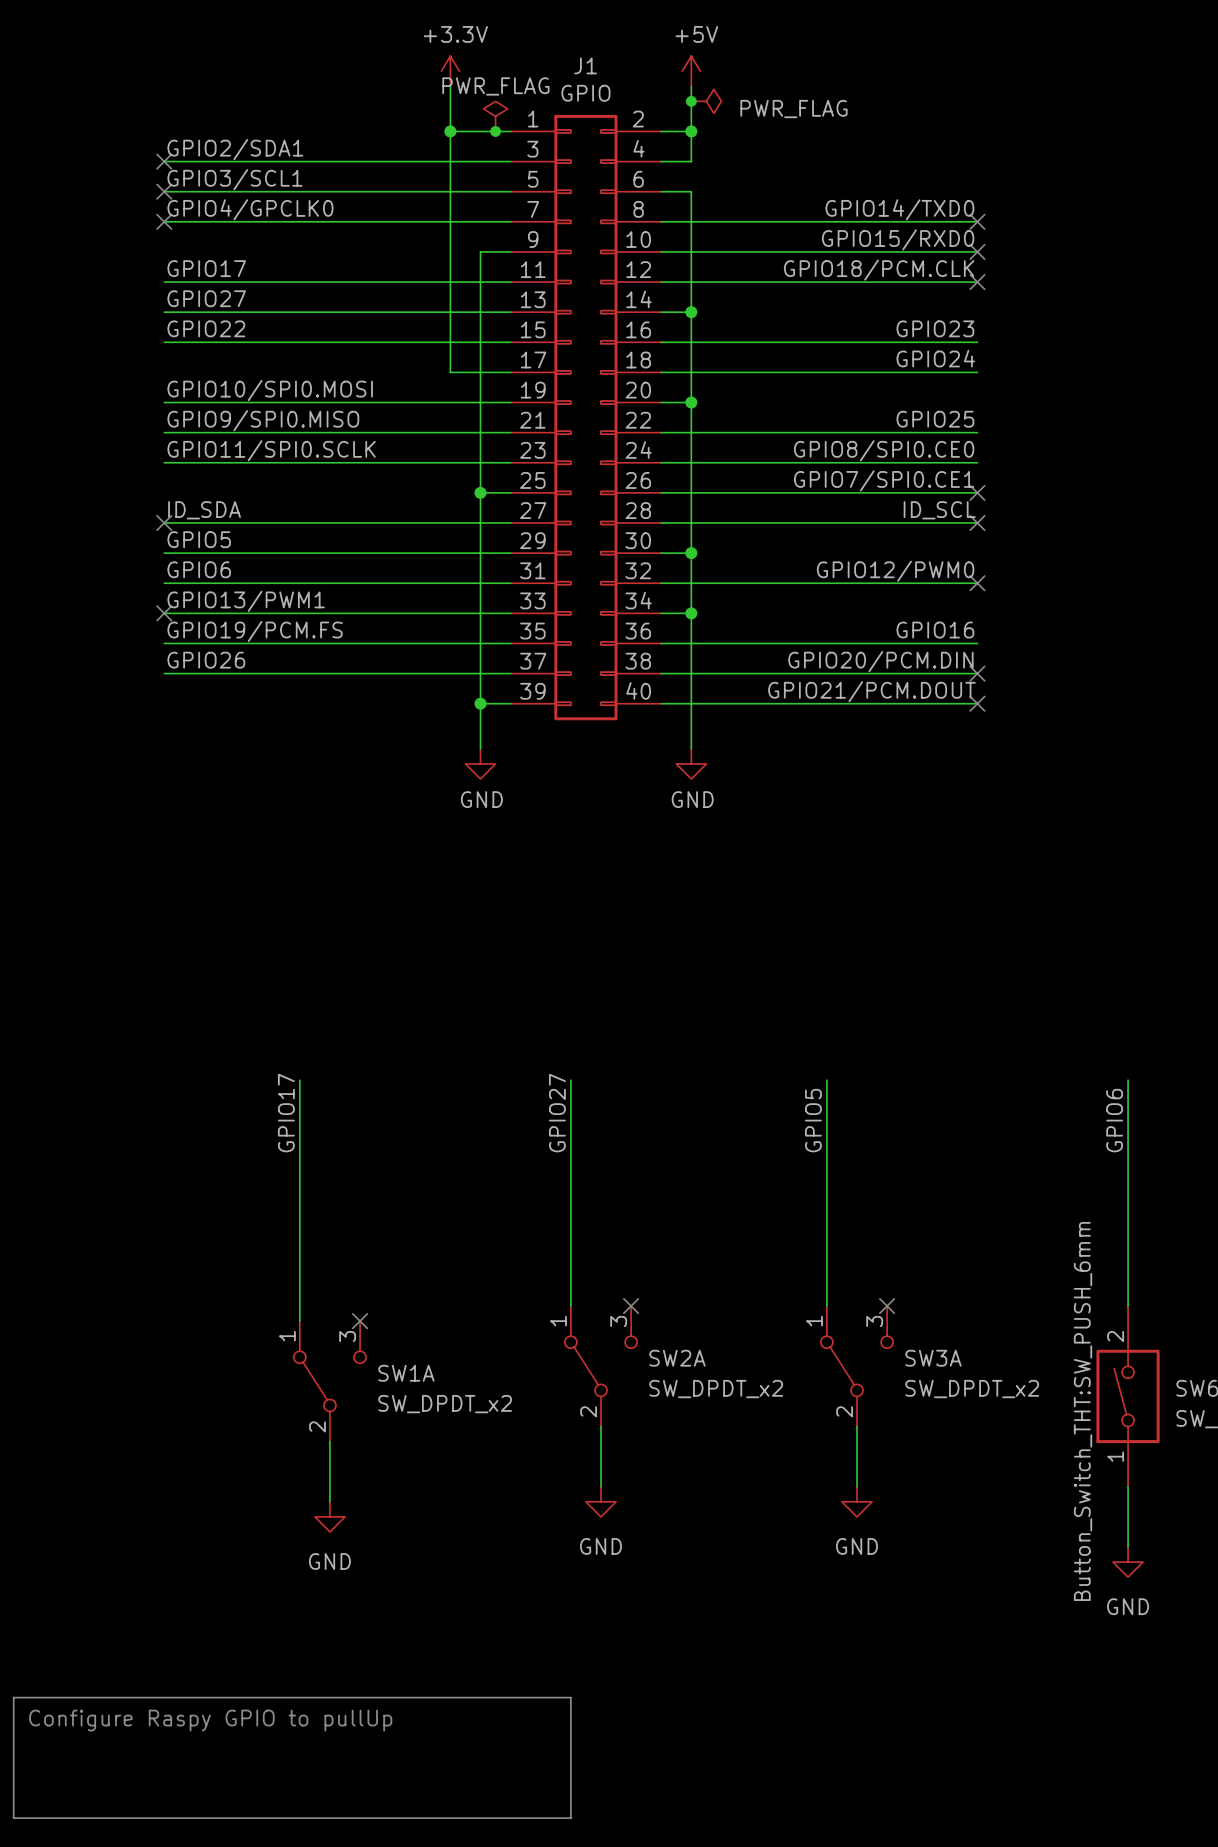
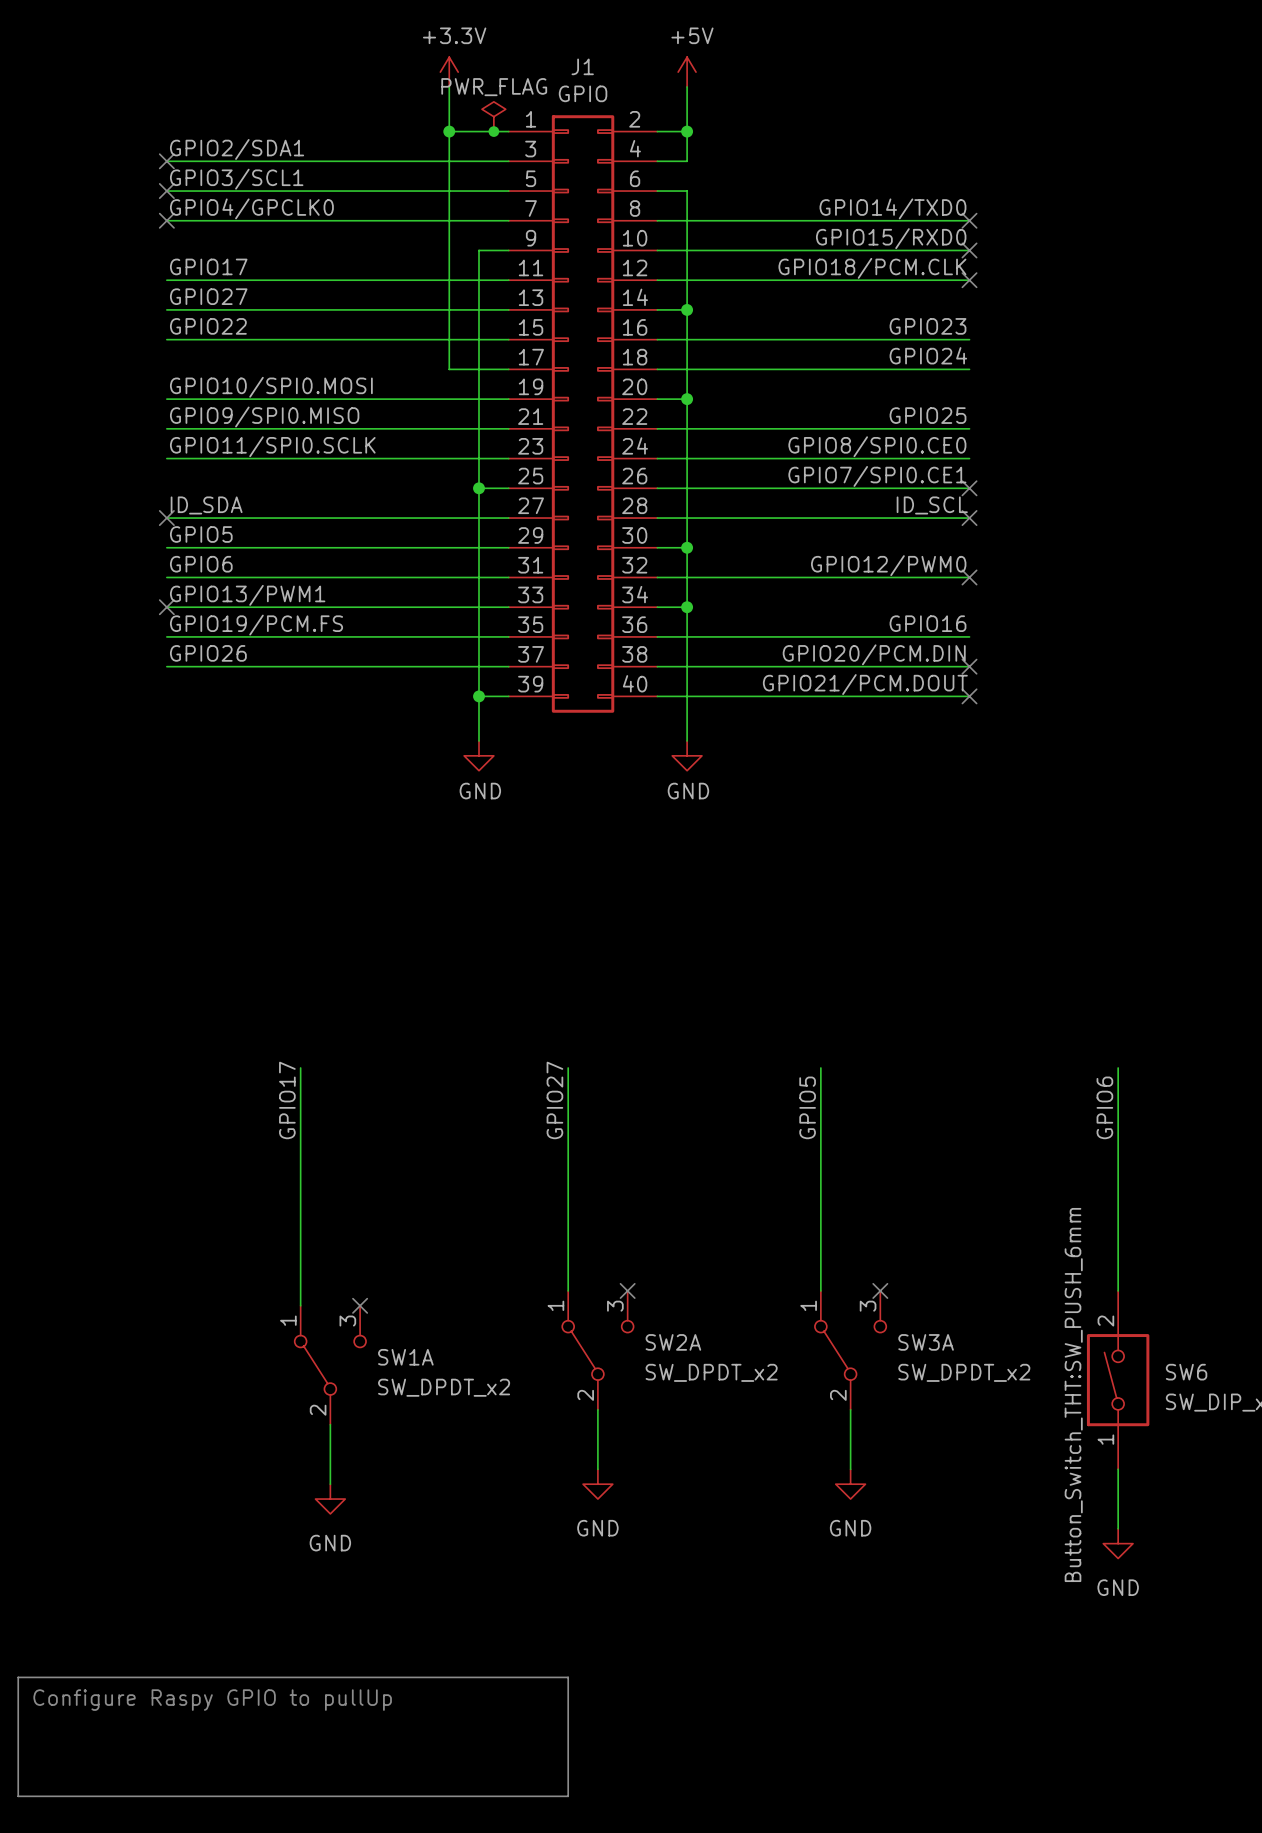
junction: (691, 101) -> none
power symbol: PWR_FLAG (706, 101) -> none

